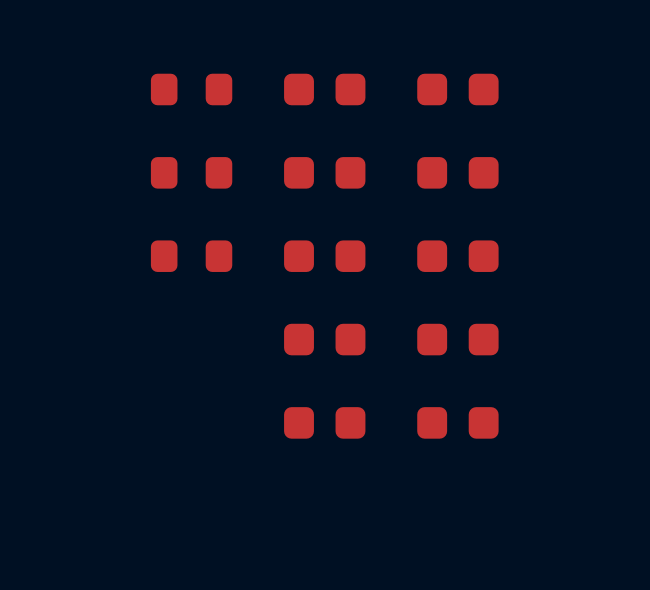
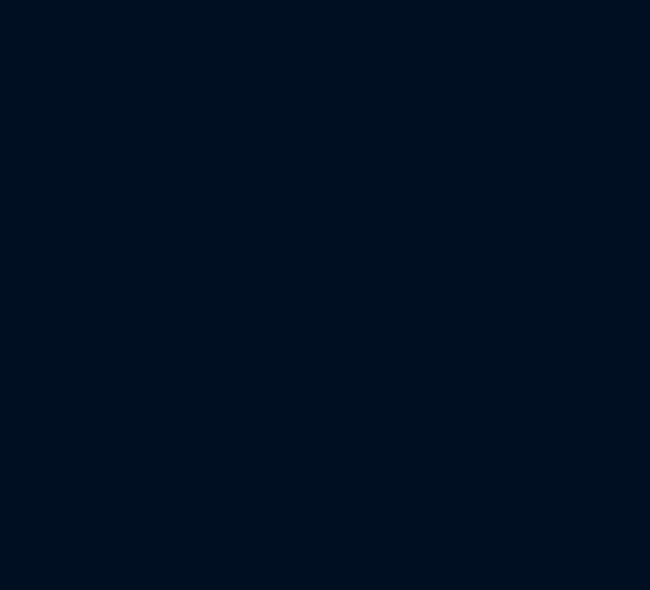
part: (191, 89) -> none
part: (324, 89) -> none
part: (457, 89) -> none
part: (191, 172) -> none
part: (324, 172) -> none
part: (457, 172) -> none
part: (191, 256) -> none
part: (324, 256) -> none
part: (457, 256) -> none
part: (324, 339) -> none
part: (457, 339) -> none
part: (324, 422) -> none
part: (457, 422) -> none

